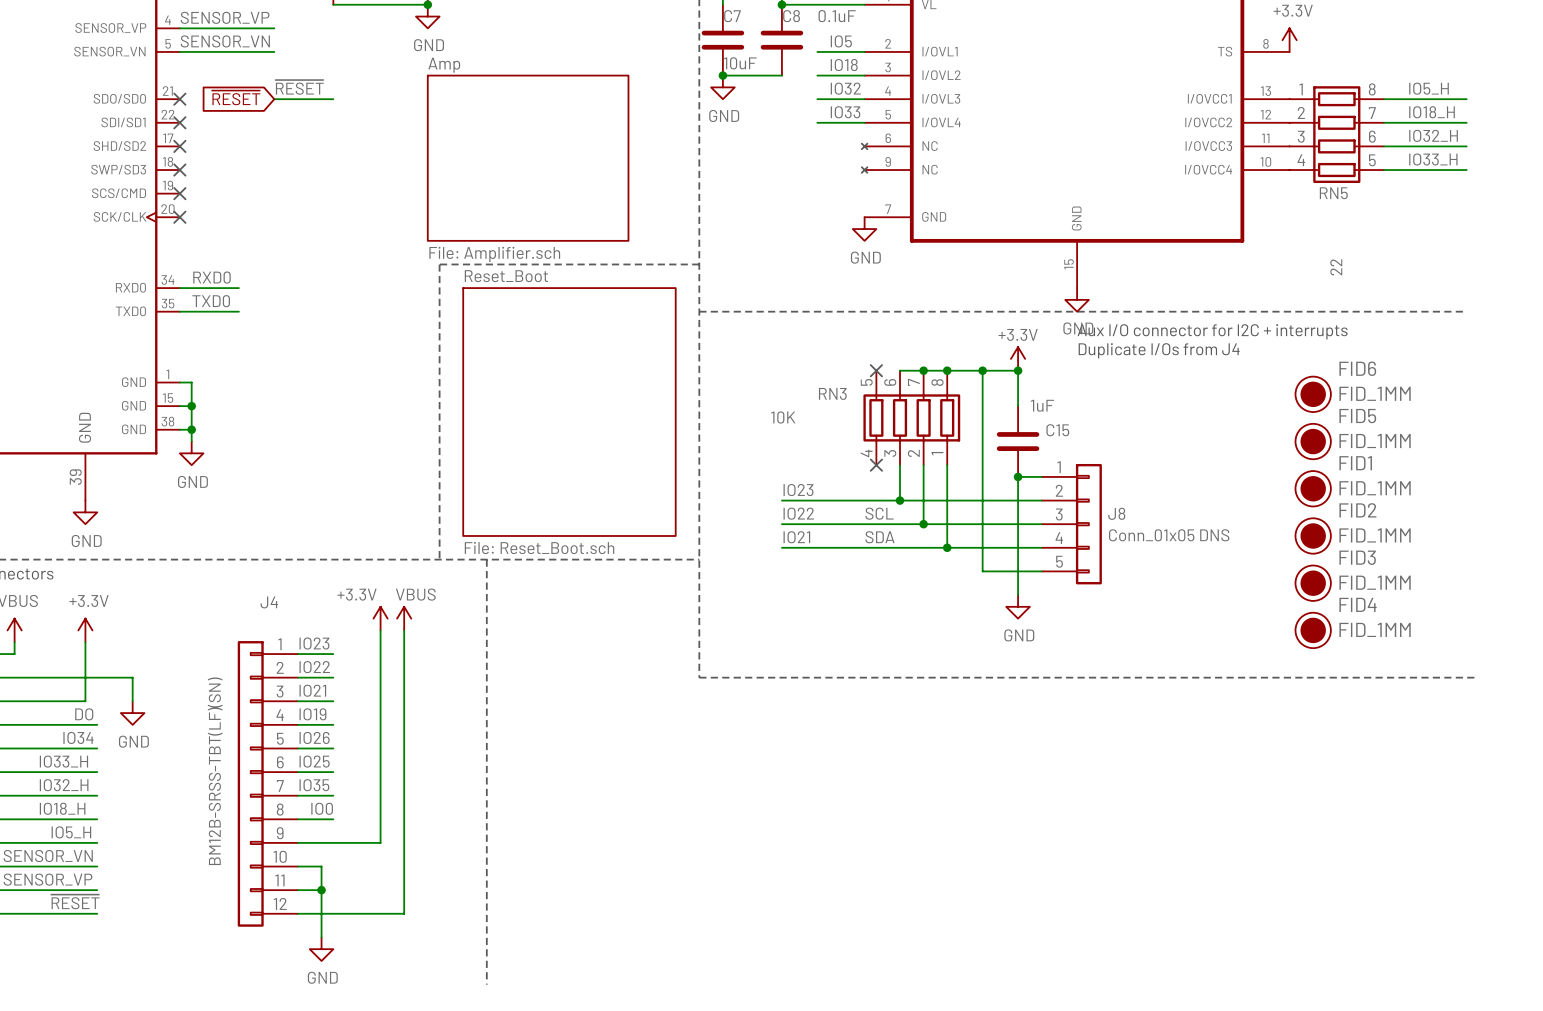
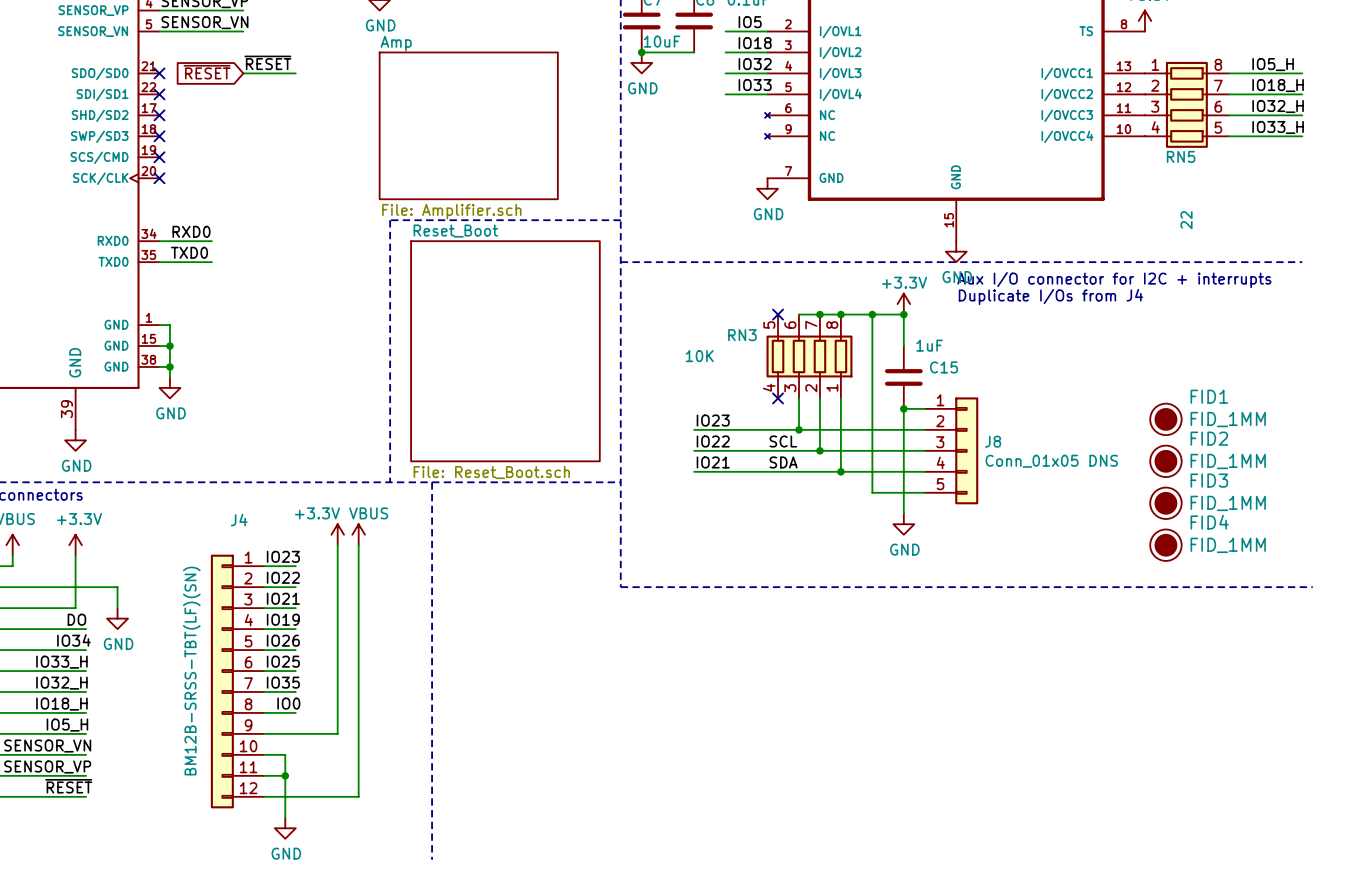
FID6: FID_1MM (1313, 394) -> none
FID5: FID_1MM (1313, 441) -> none

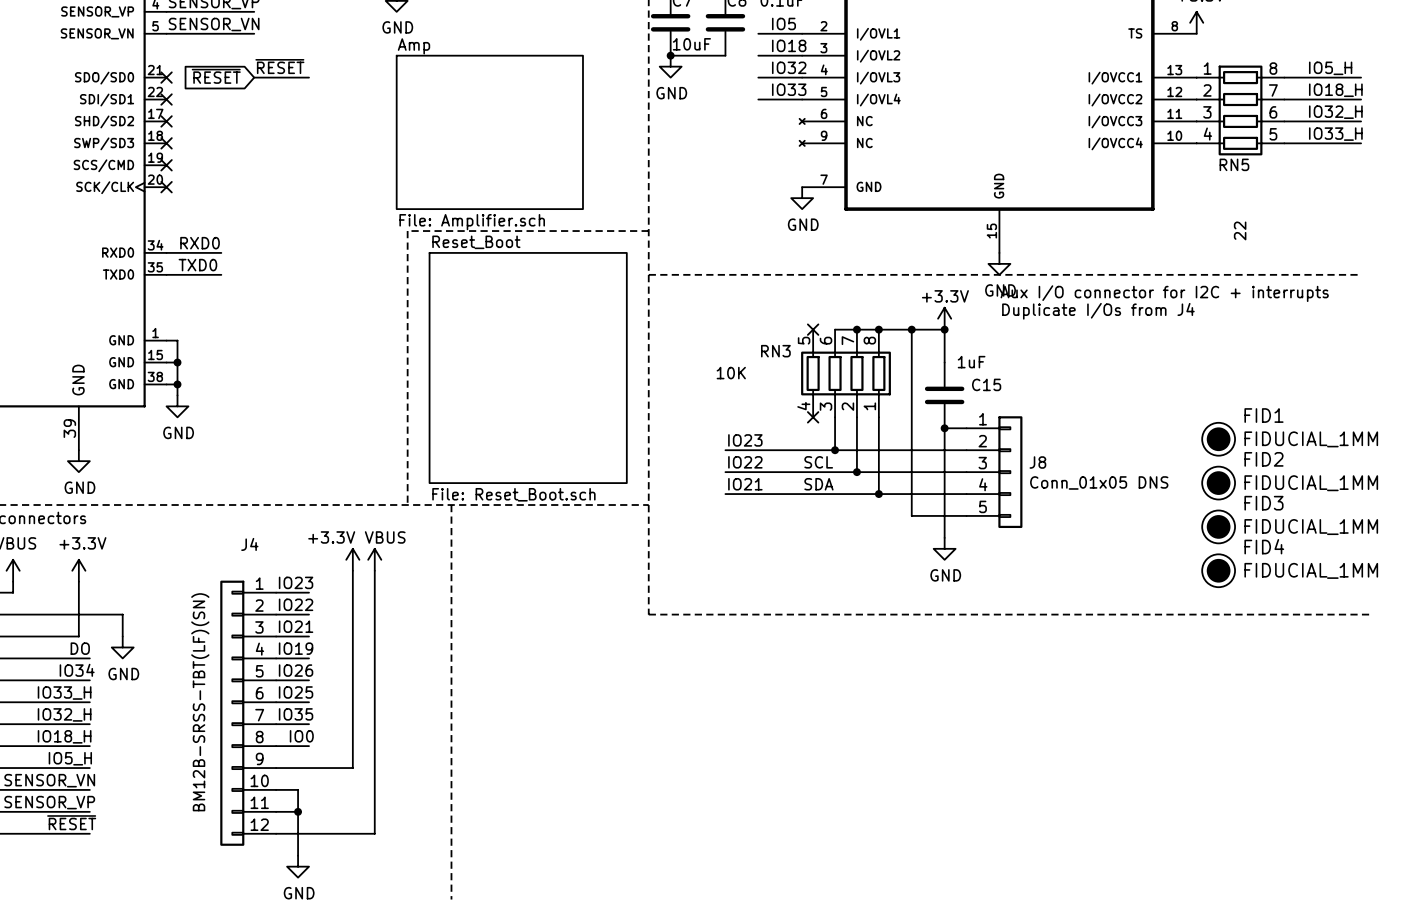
FID1 value: FID_1MM (1228, 419) -> FIDUCIAL_1MM (1311, 439)
FID2 value: FID_1MM (1228, 461) -> FIDUCIAL_1MM (1311, 483)
FID3 value: FID_1MM (1228, 503) -> FIDUCIAL_1MM (1311, 527)
FID4 value: FID_1MM (1228, 545) -> FIDUCIAL_1MM (1311, 570)

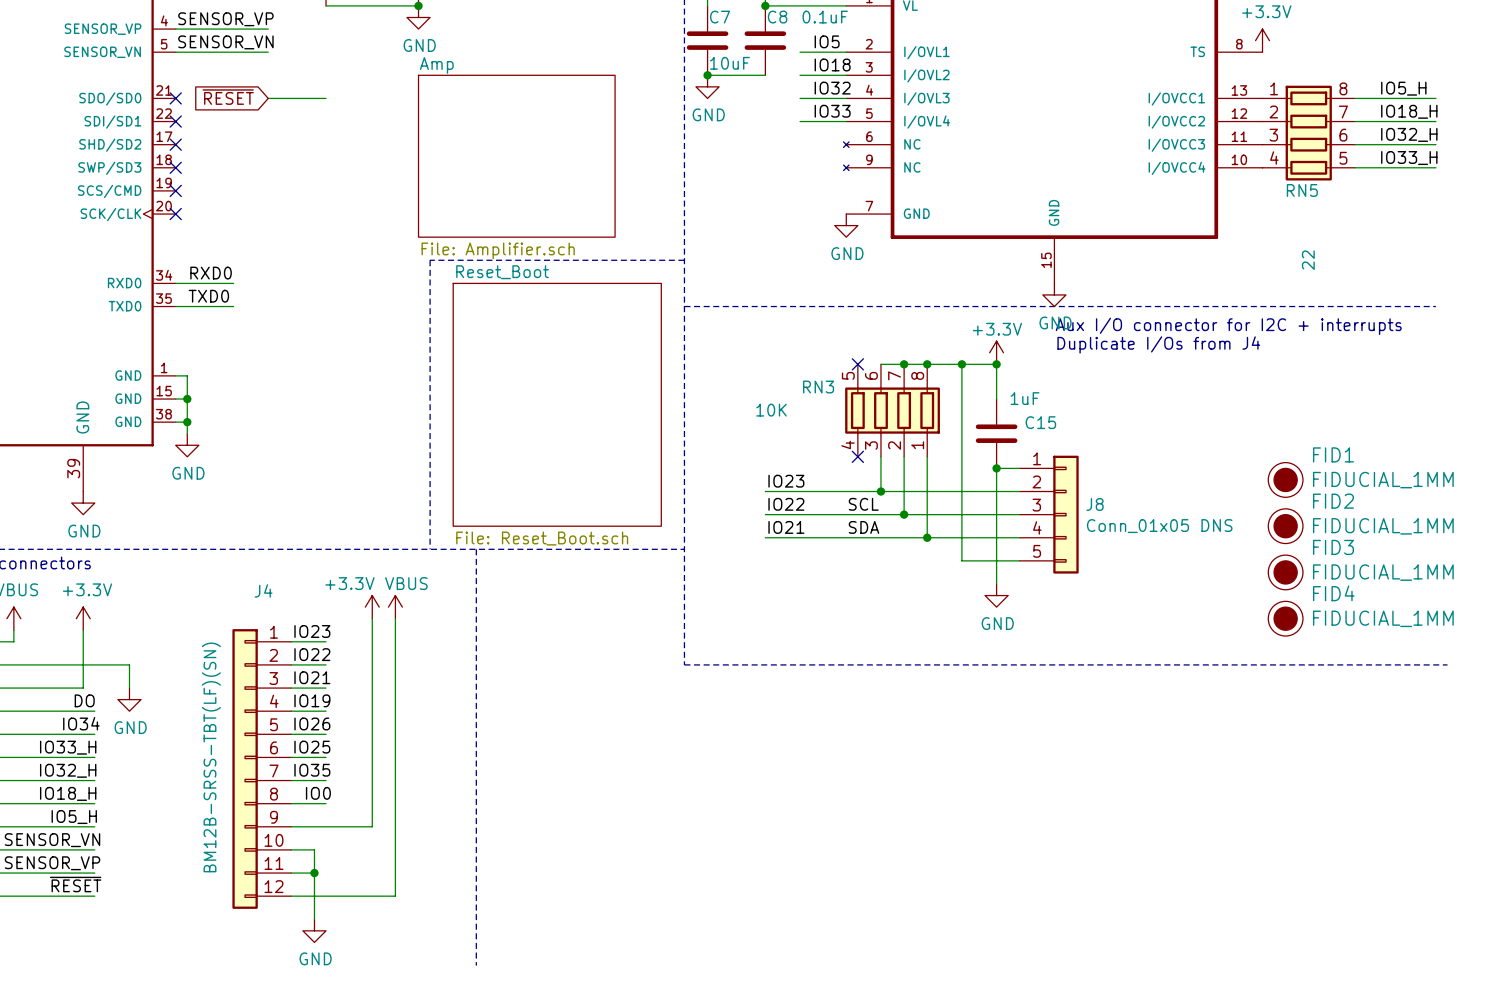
label: ~{RESET} (279, 66) -> none

